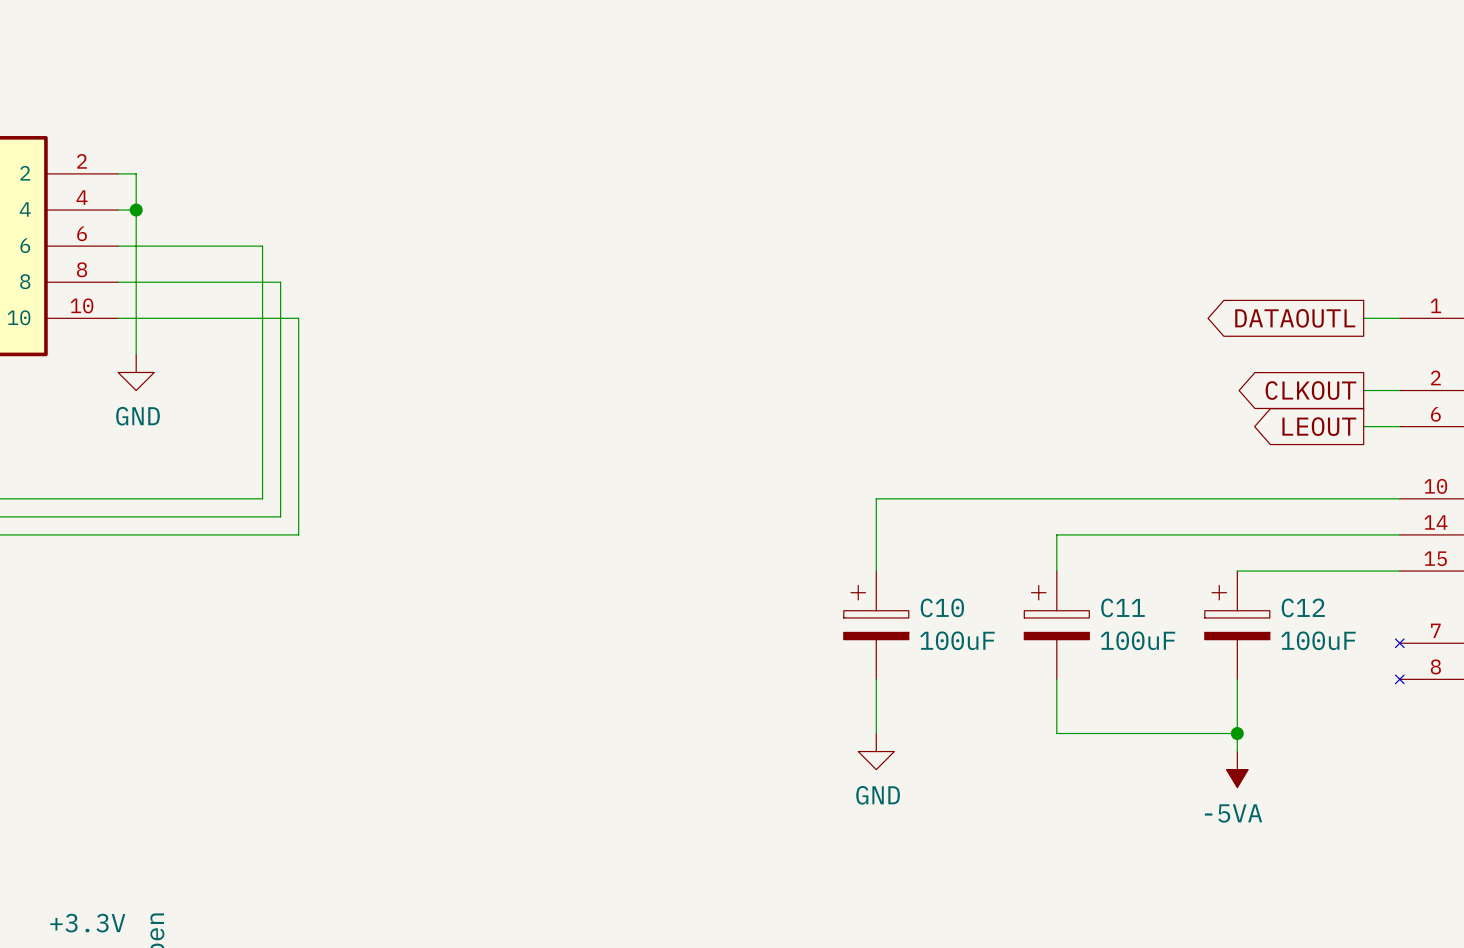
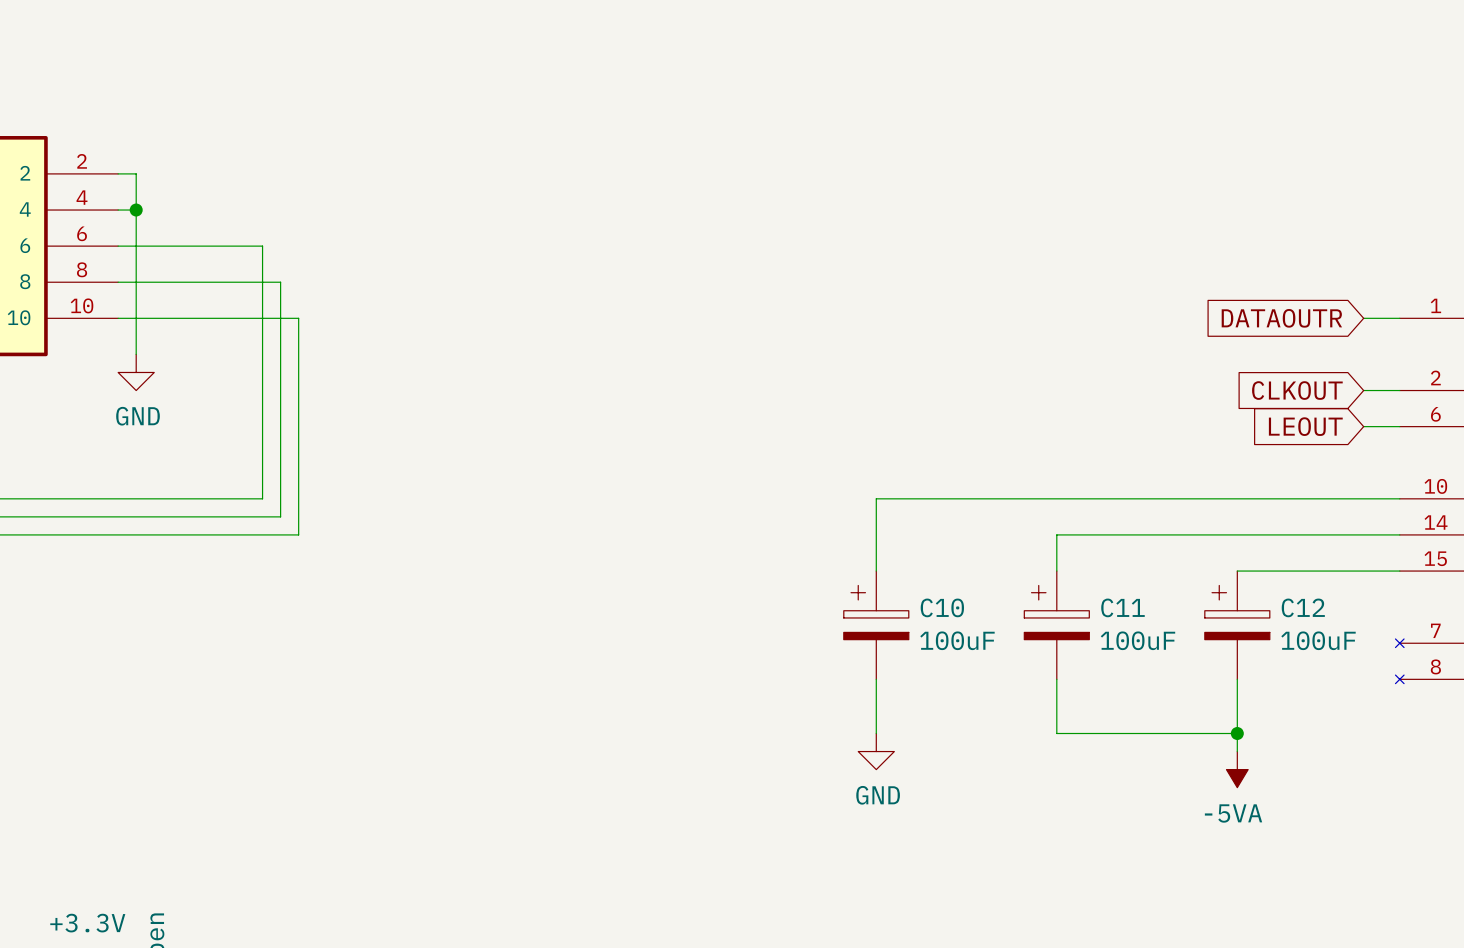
global label shape: output (1295, 318) -> input (1281, 318)
global label: DATAOUTL (1295, 318) -> DATAOUTR (1281, 318)
global label shape: output (1310, 390) -> input (1297, 390)
global label shape: output (1319, 426) -> input (1305, 426)

